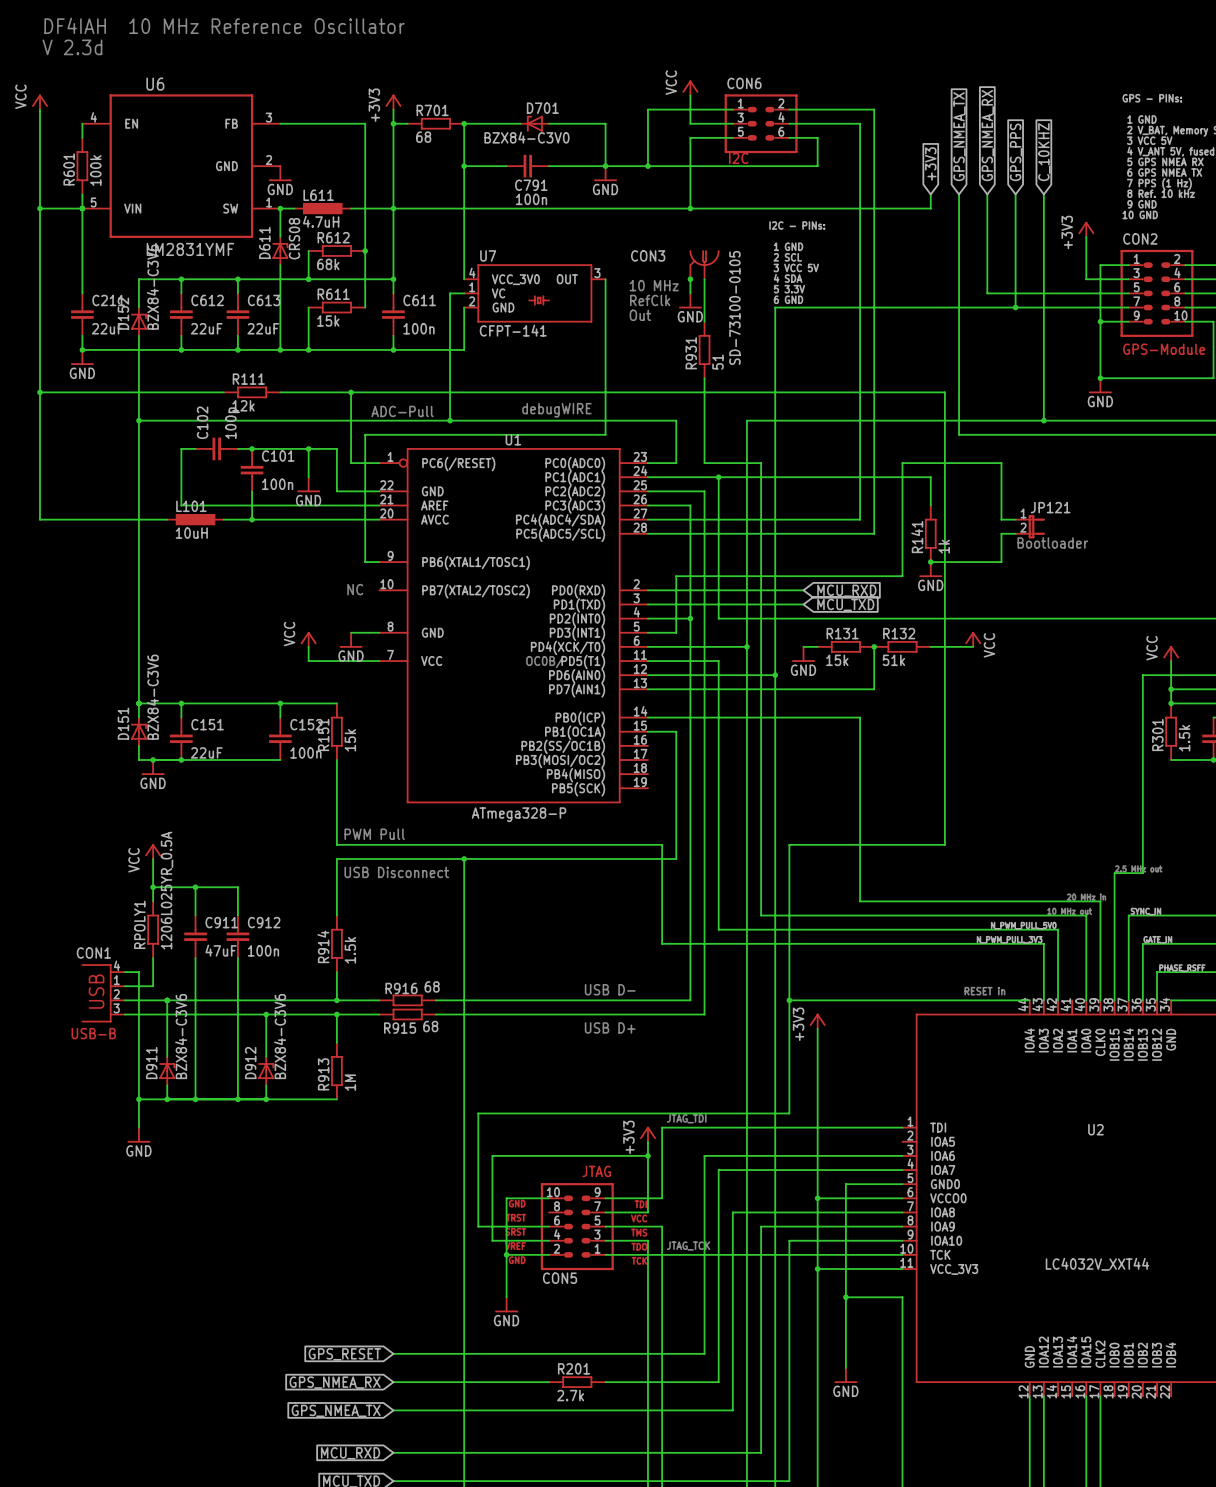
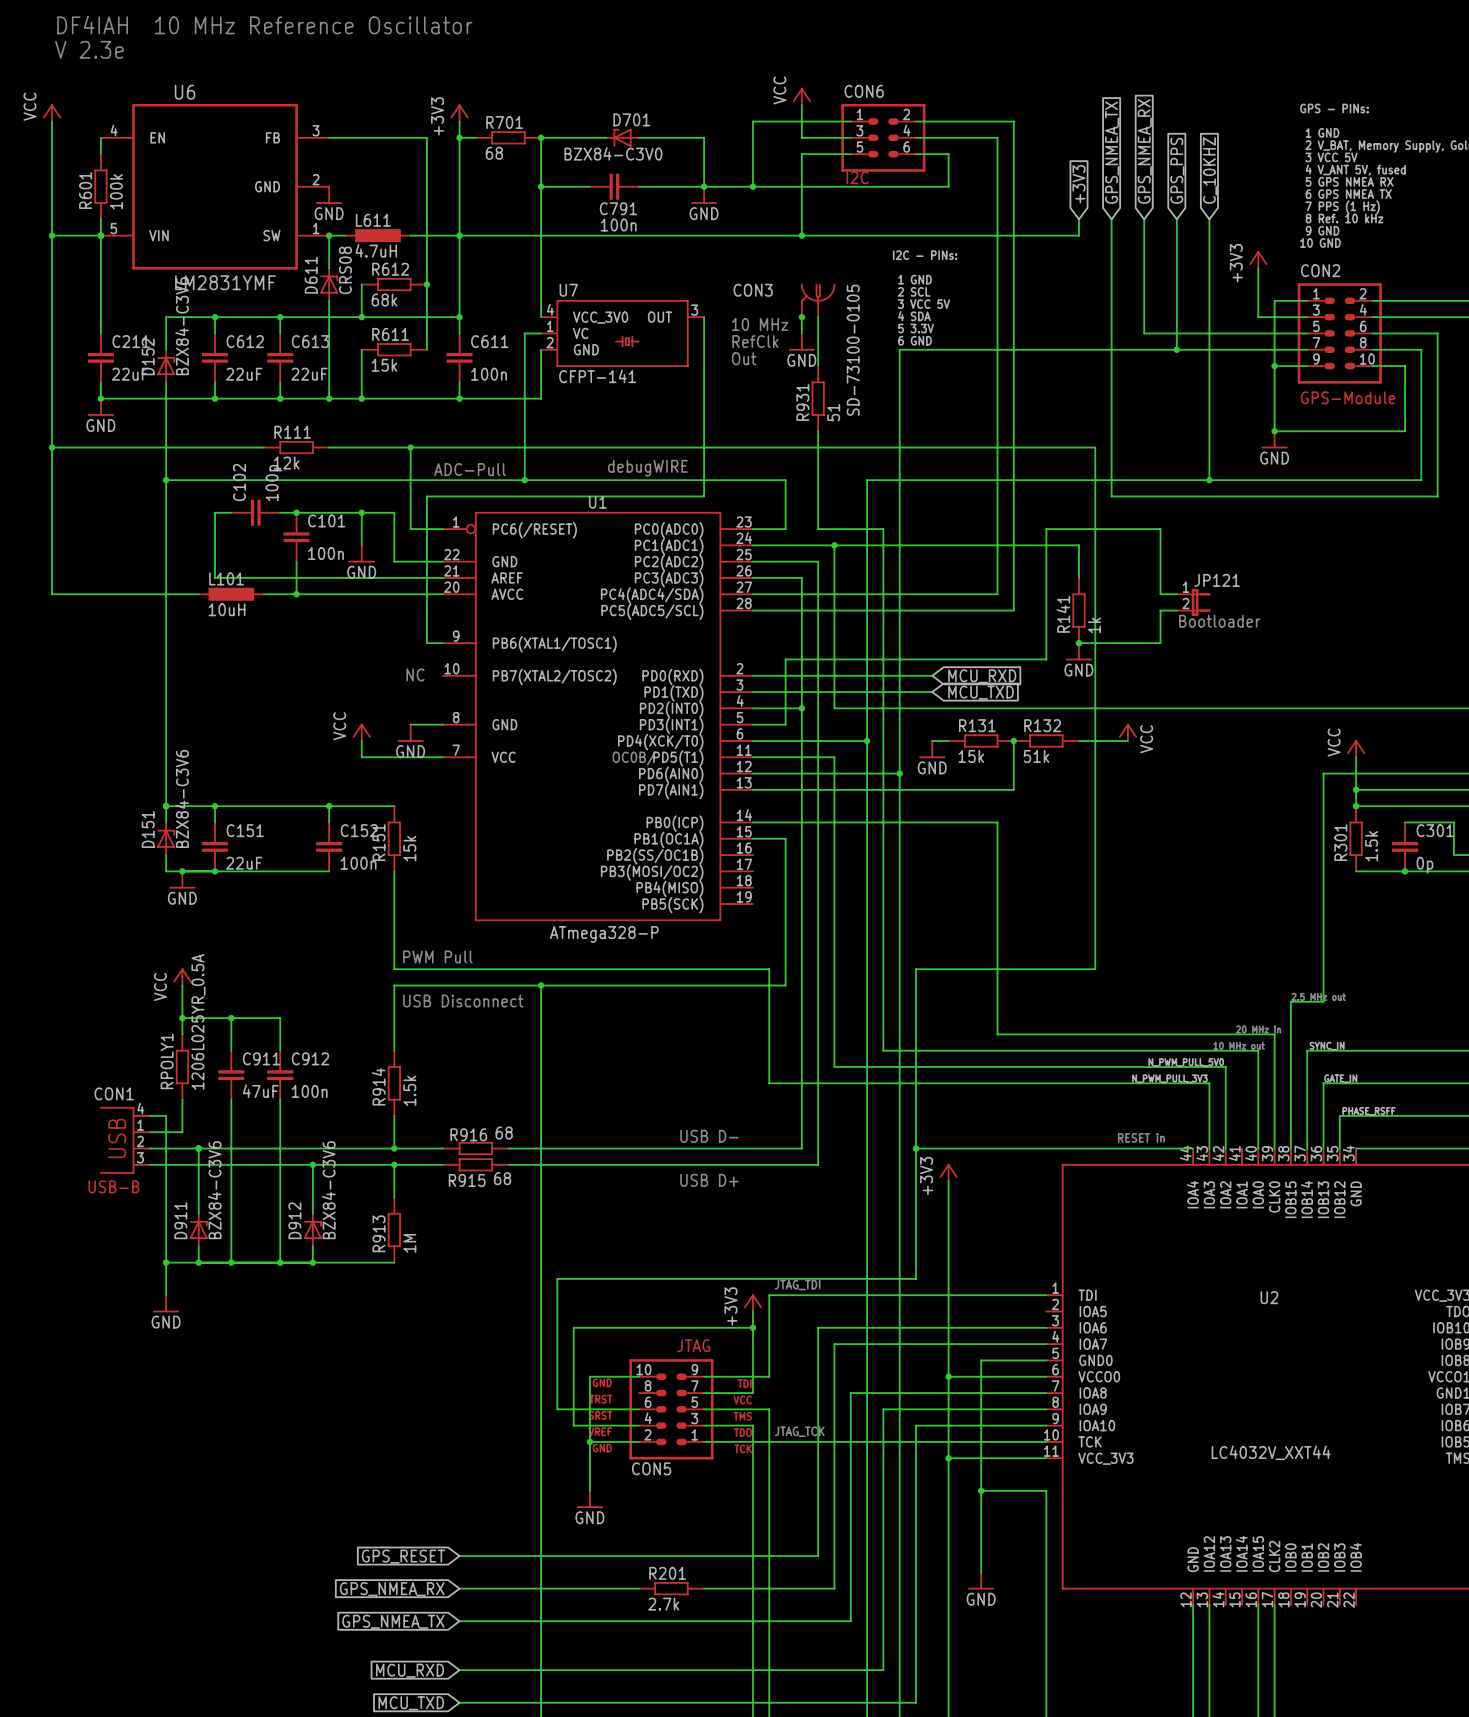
text: V 2.3d (72, 47) -> V 2.3e (89, 49)

